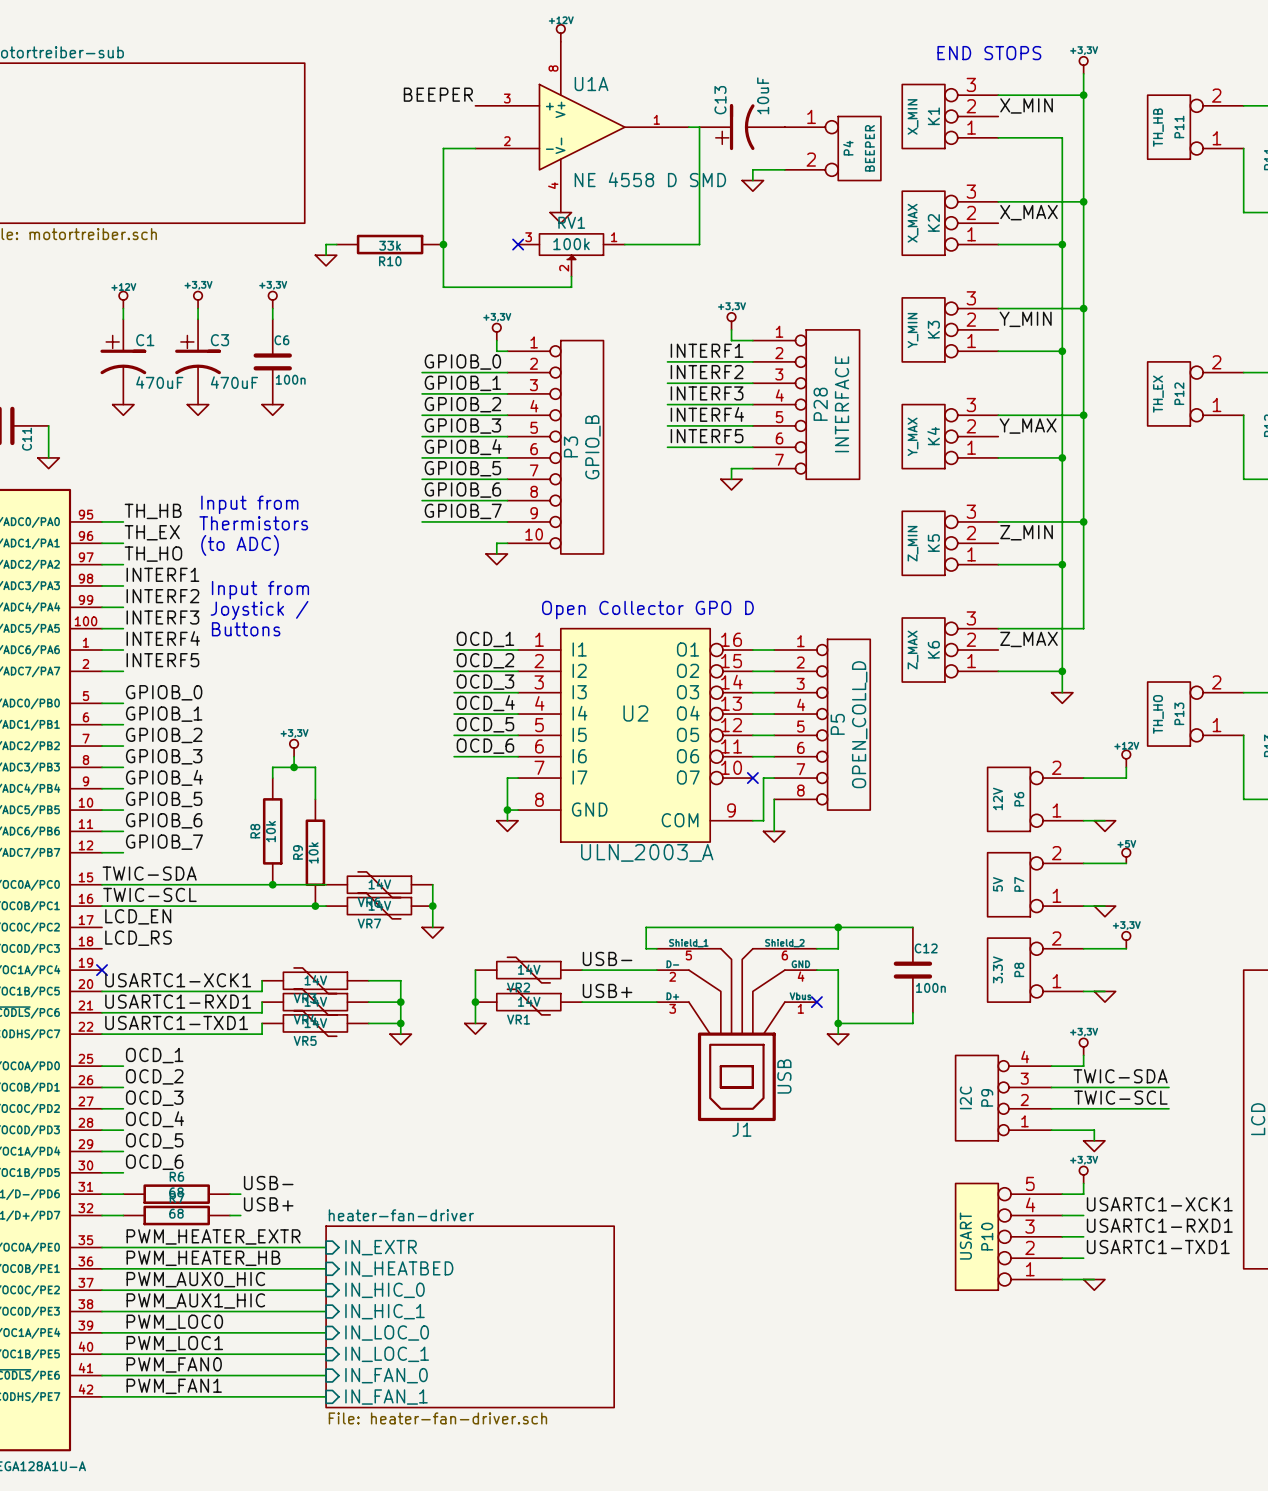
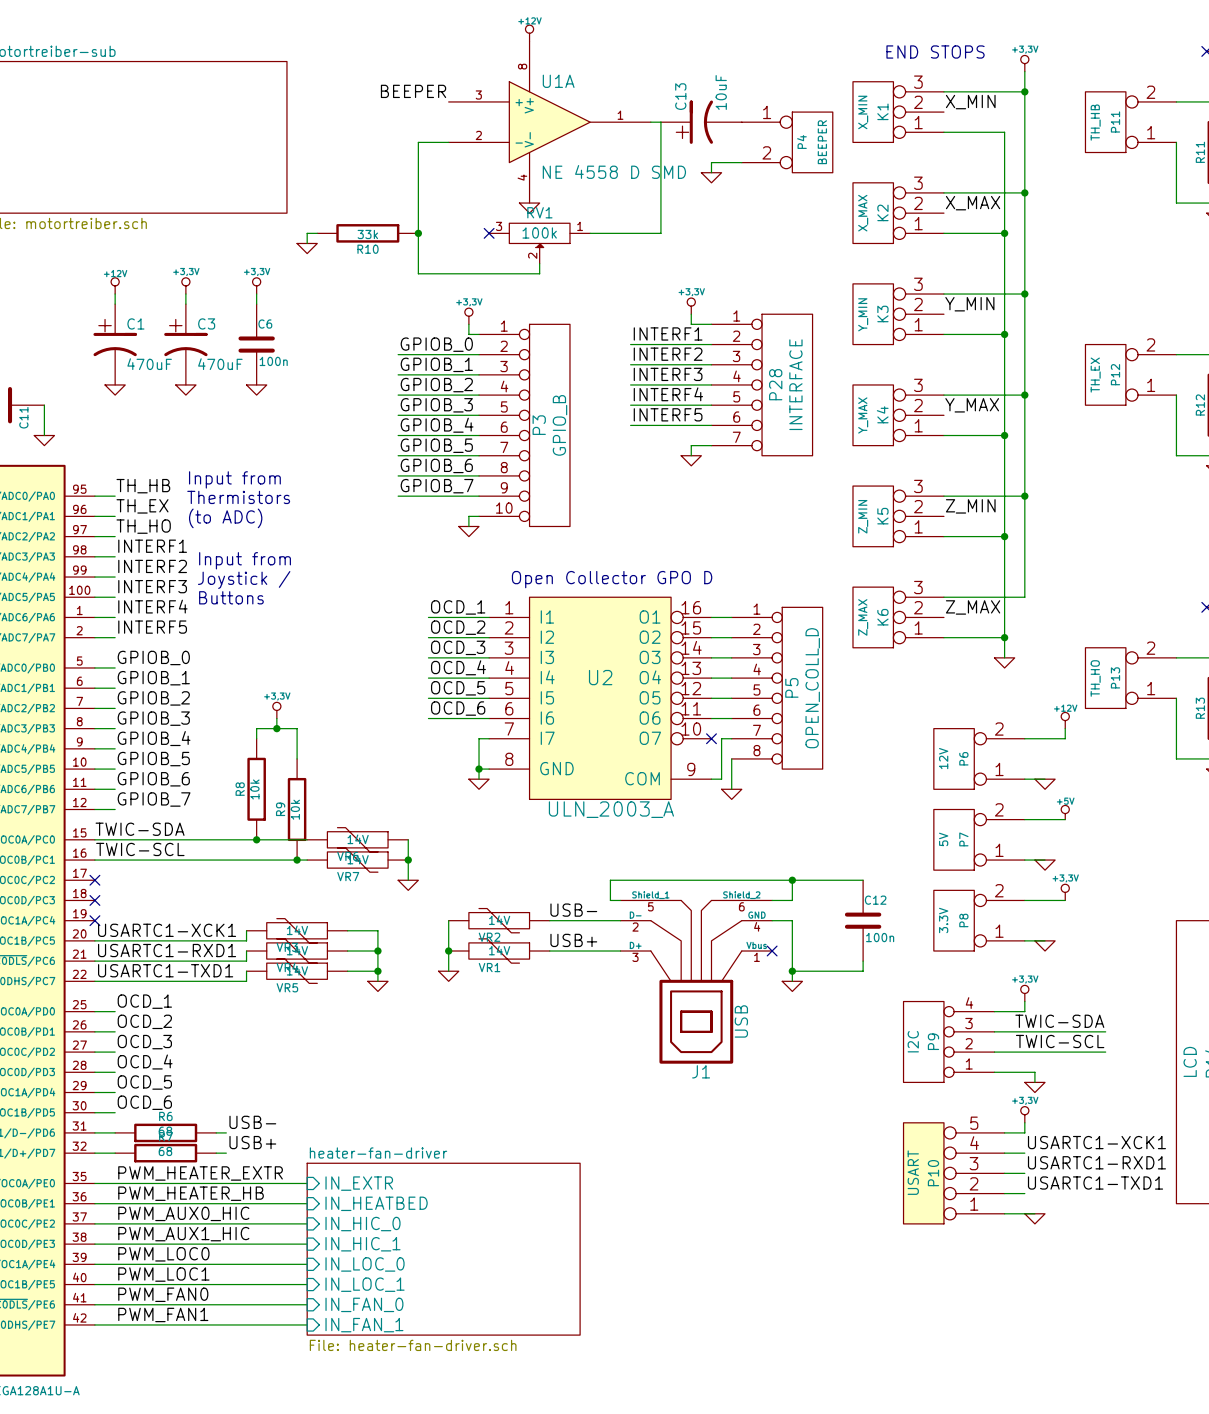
label: LCD_EN (138, 916) -> none
no-connect mark: none -> (94, 880)
label: LCD_RS (138, 938) -> none
no-connect mark: none -> (94, 900)

